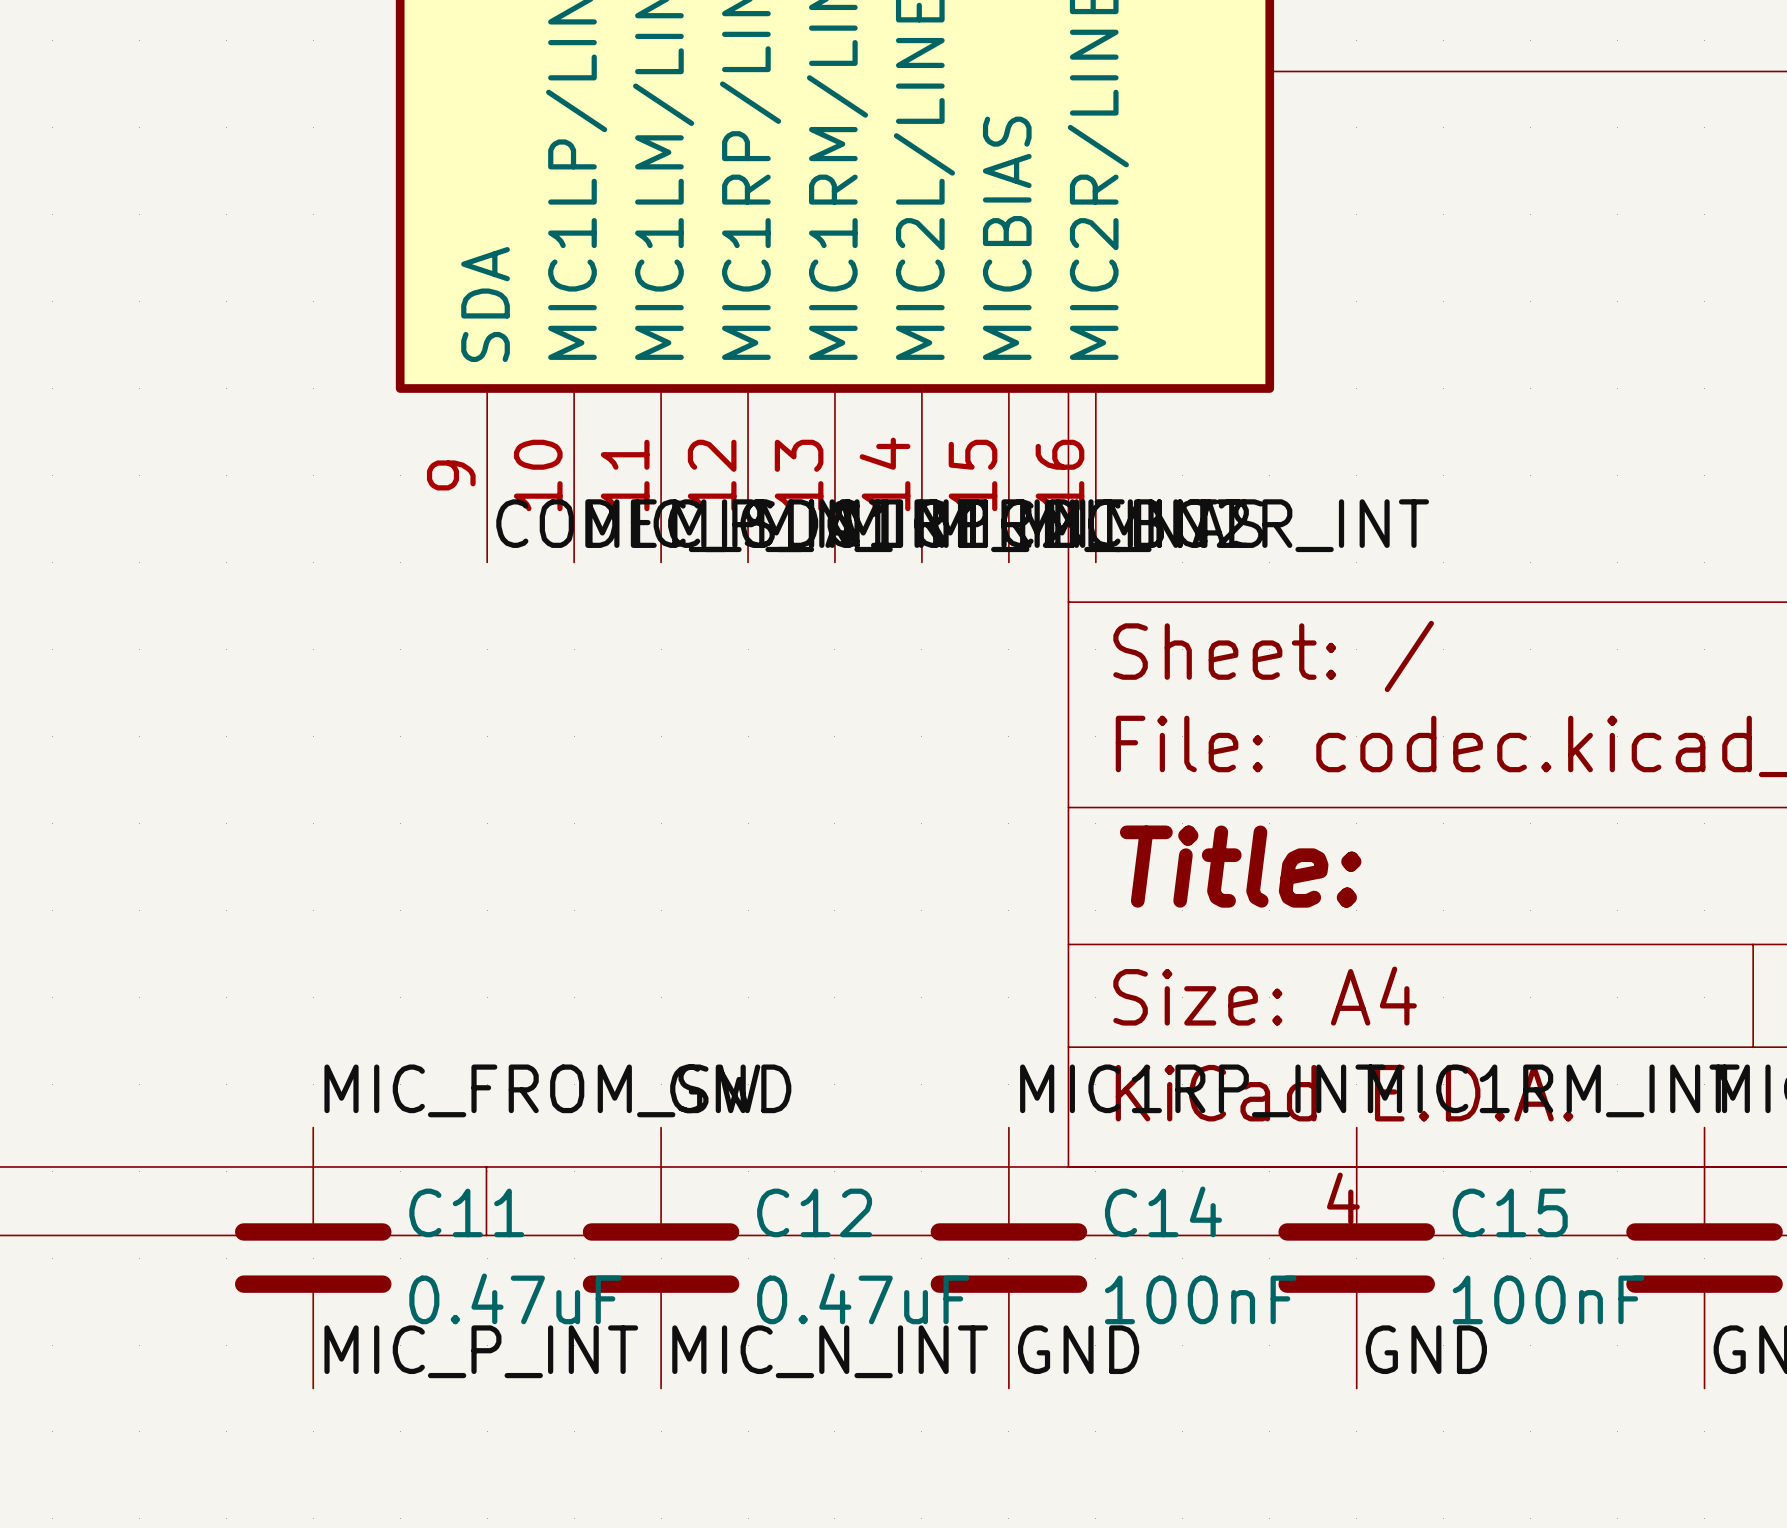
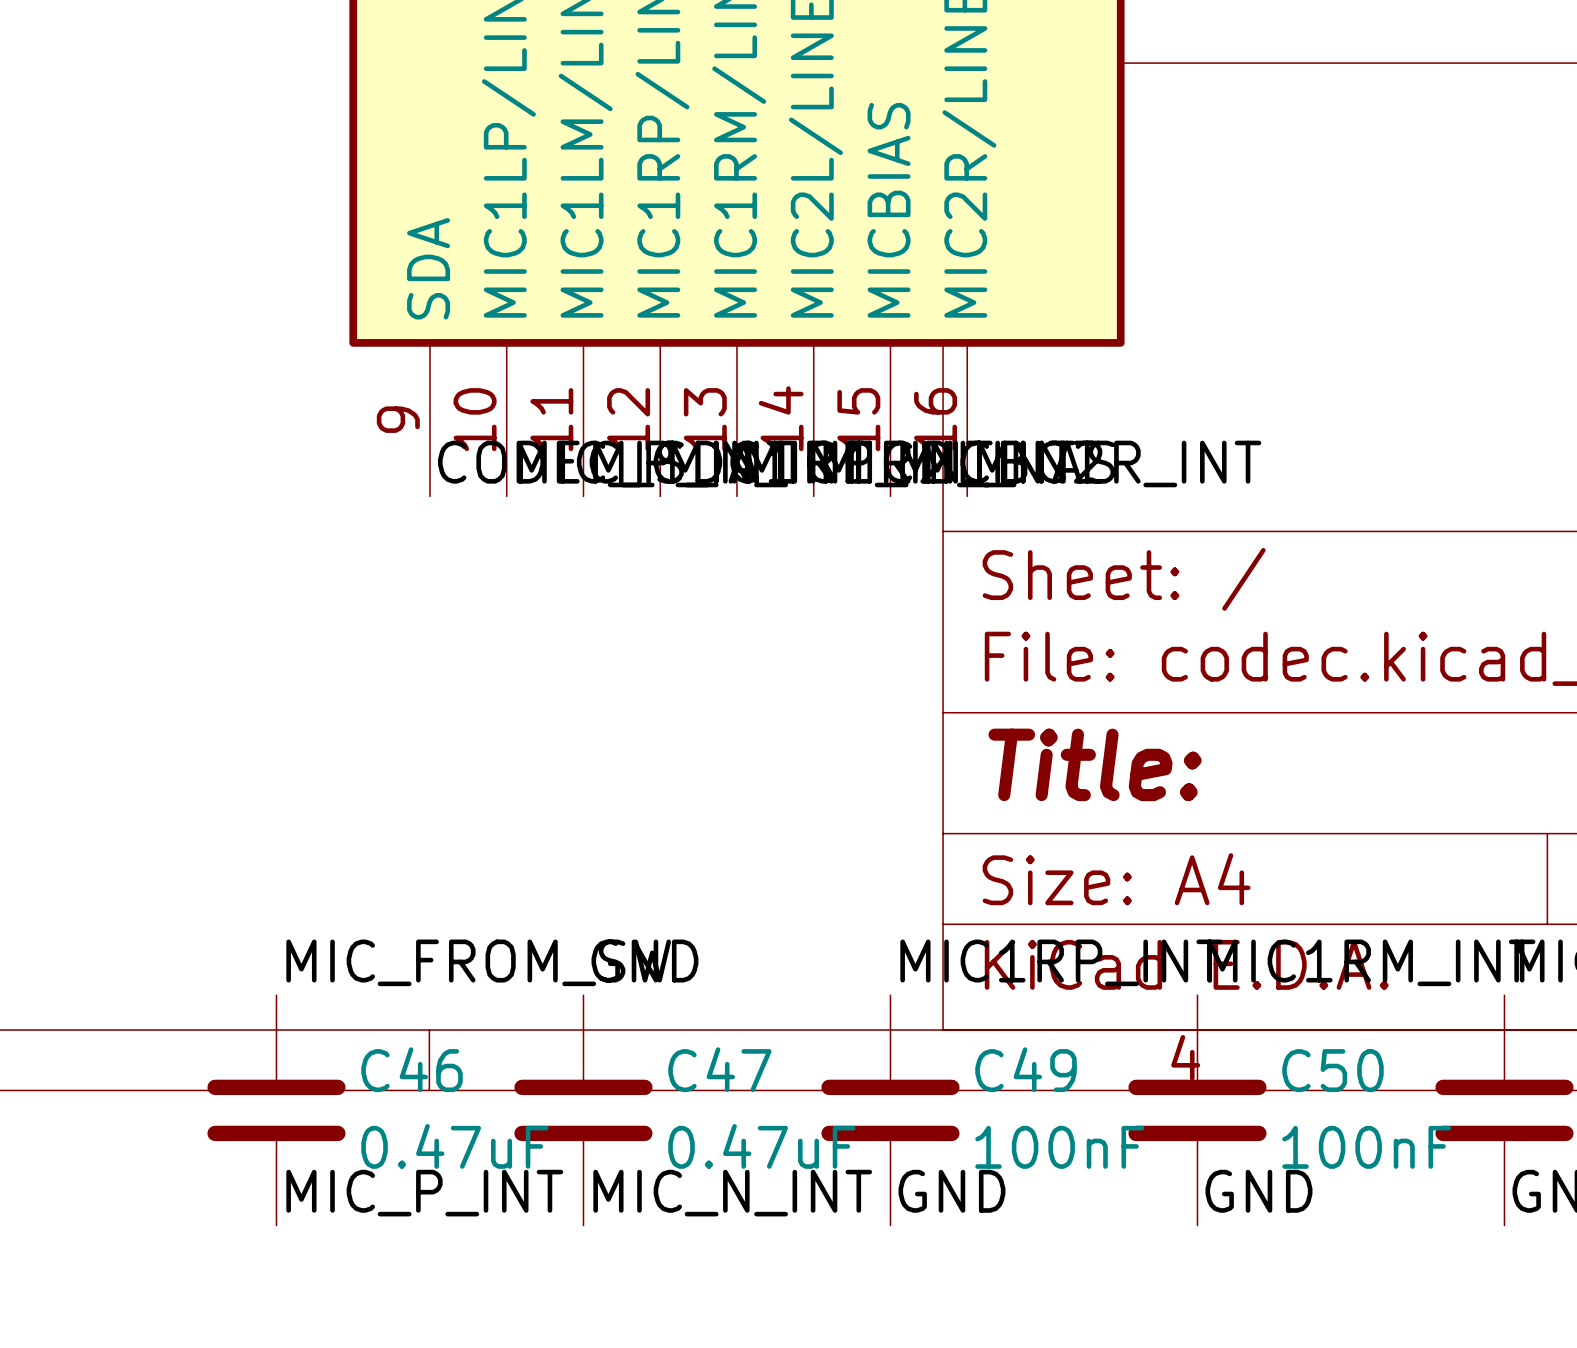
C14 name: C14 (1163, 1211) -> C49 (1025, 1069)
C11 name: C11 (466, 1212) -> C46 (411, 1069)
C12 name: C12 (814, 1212) -> C47 (719, 1069)
C15 name: C15 (1510, 1212) -> C50 (1332, 1070)

